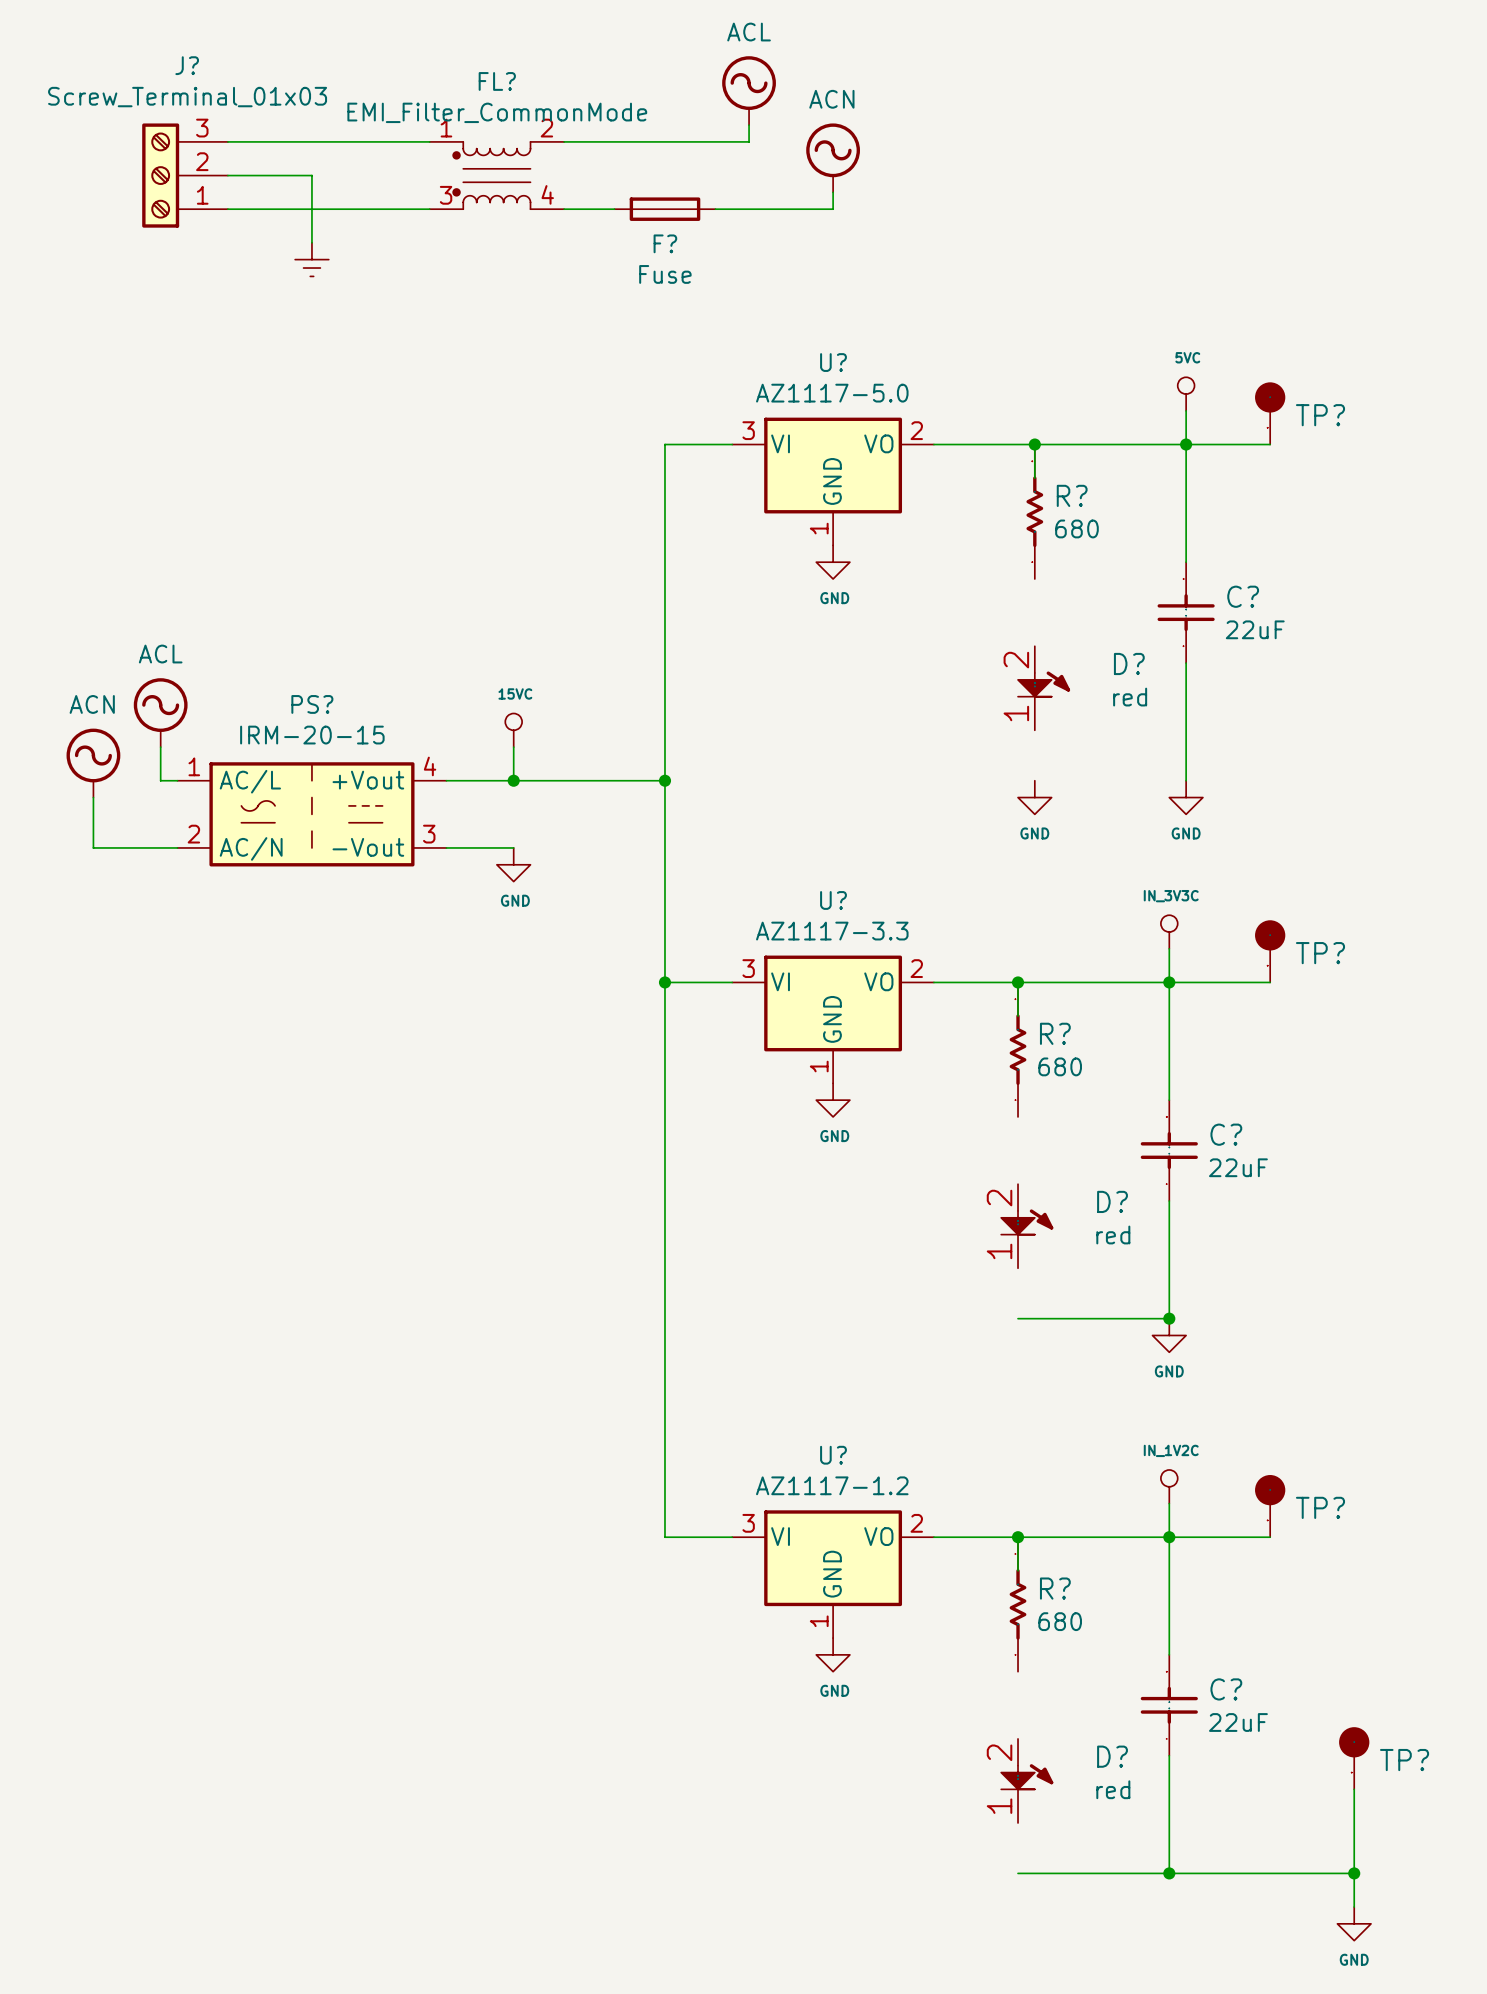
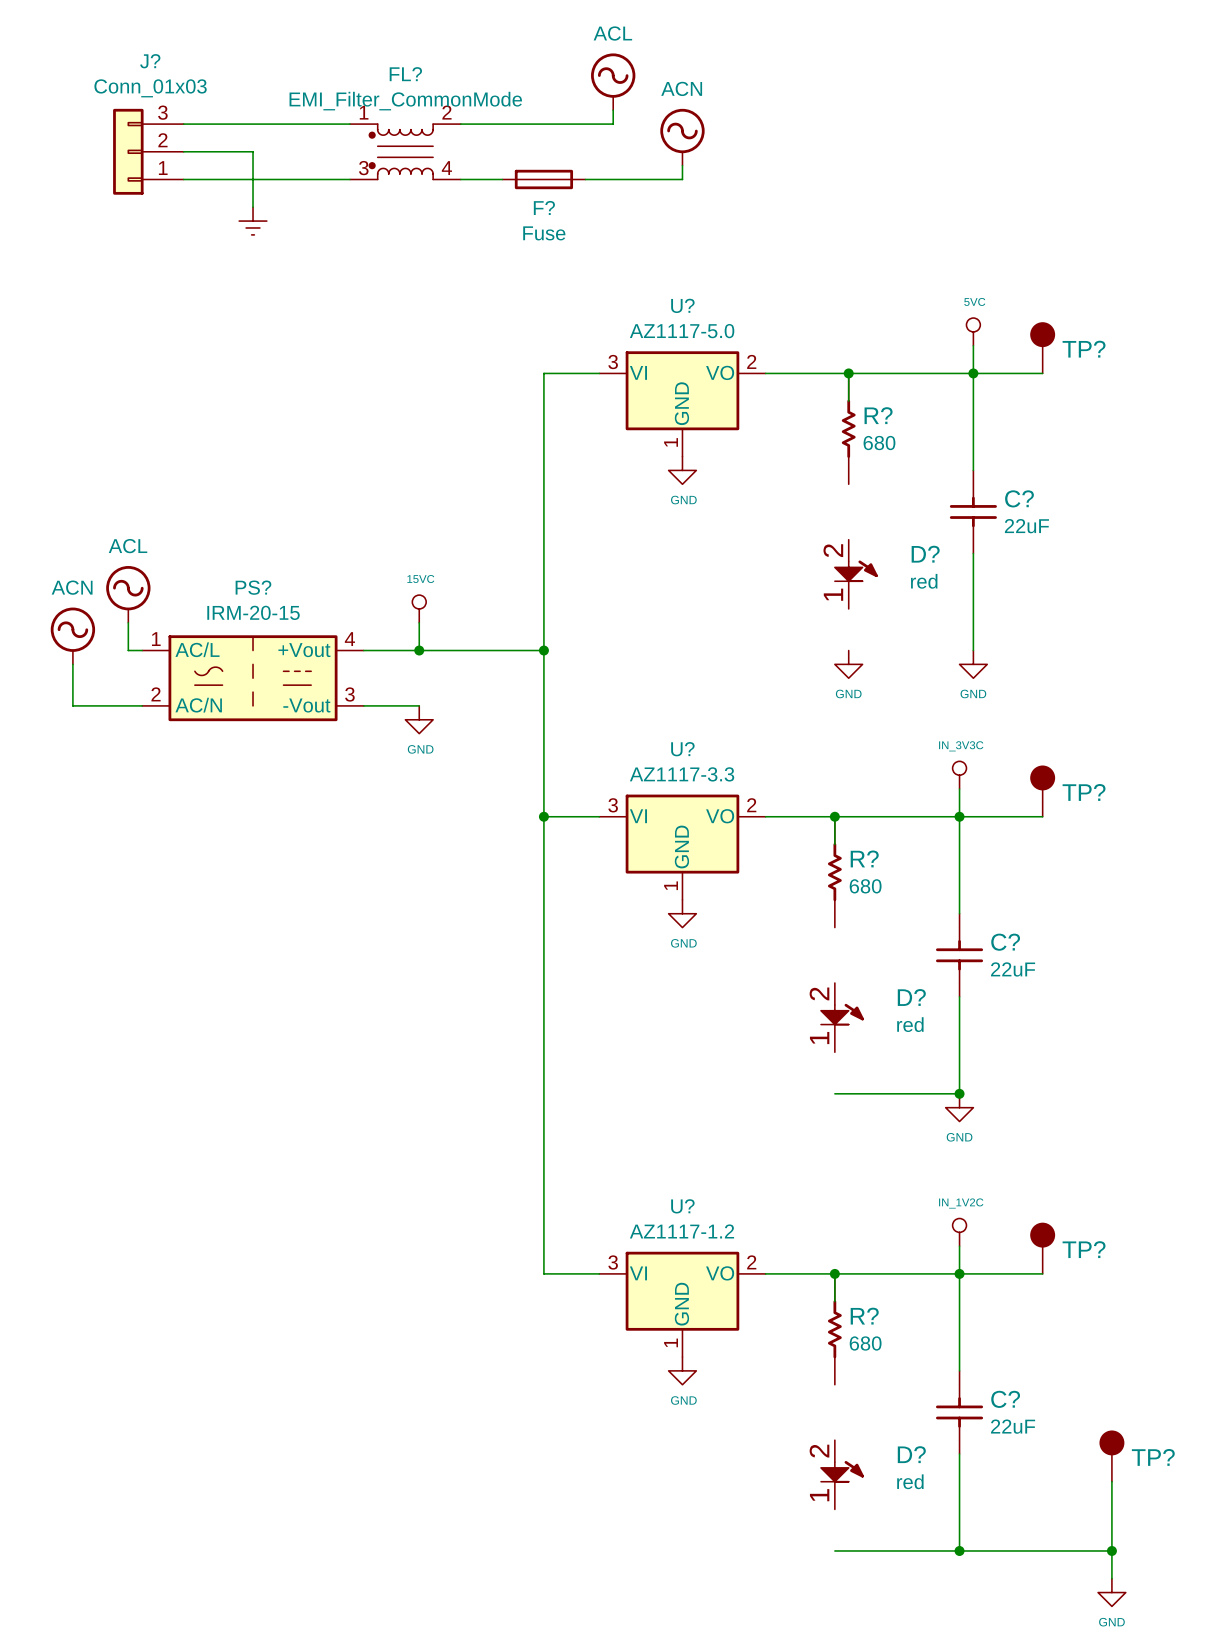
J? value: Screw_Terminal_01x03 (187, 97) -> Conn_01x03 (150, 88)
J? symbol: [142, 123, 228, 228] -> [113, 108, 184, 195]

